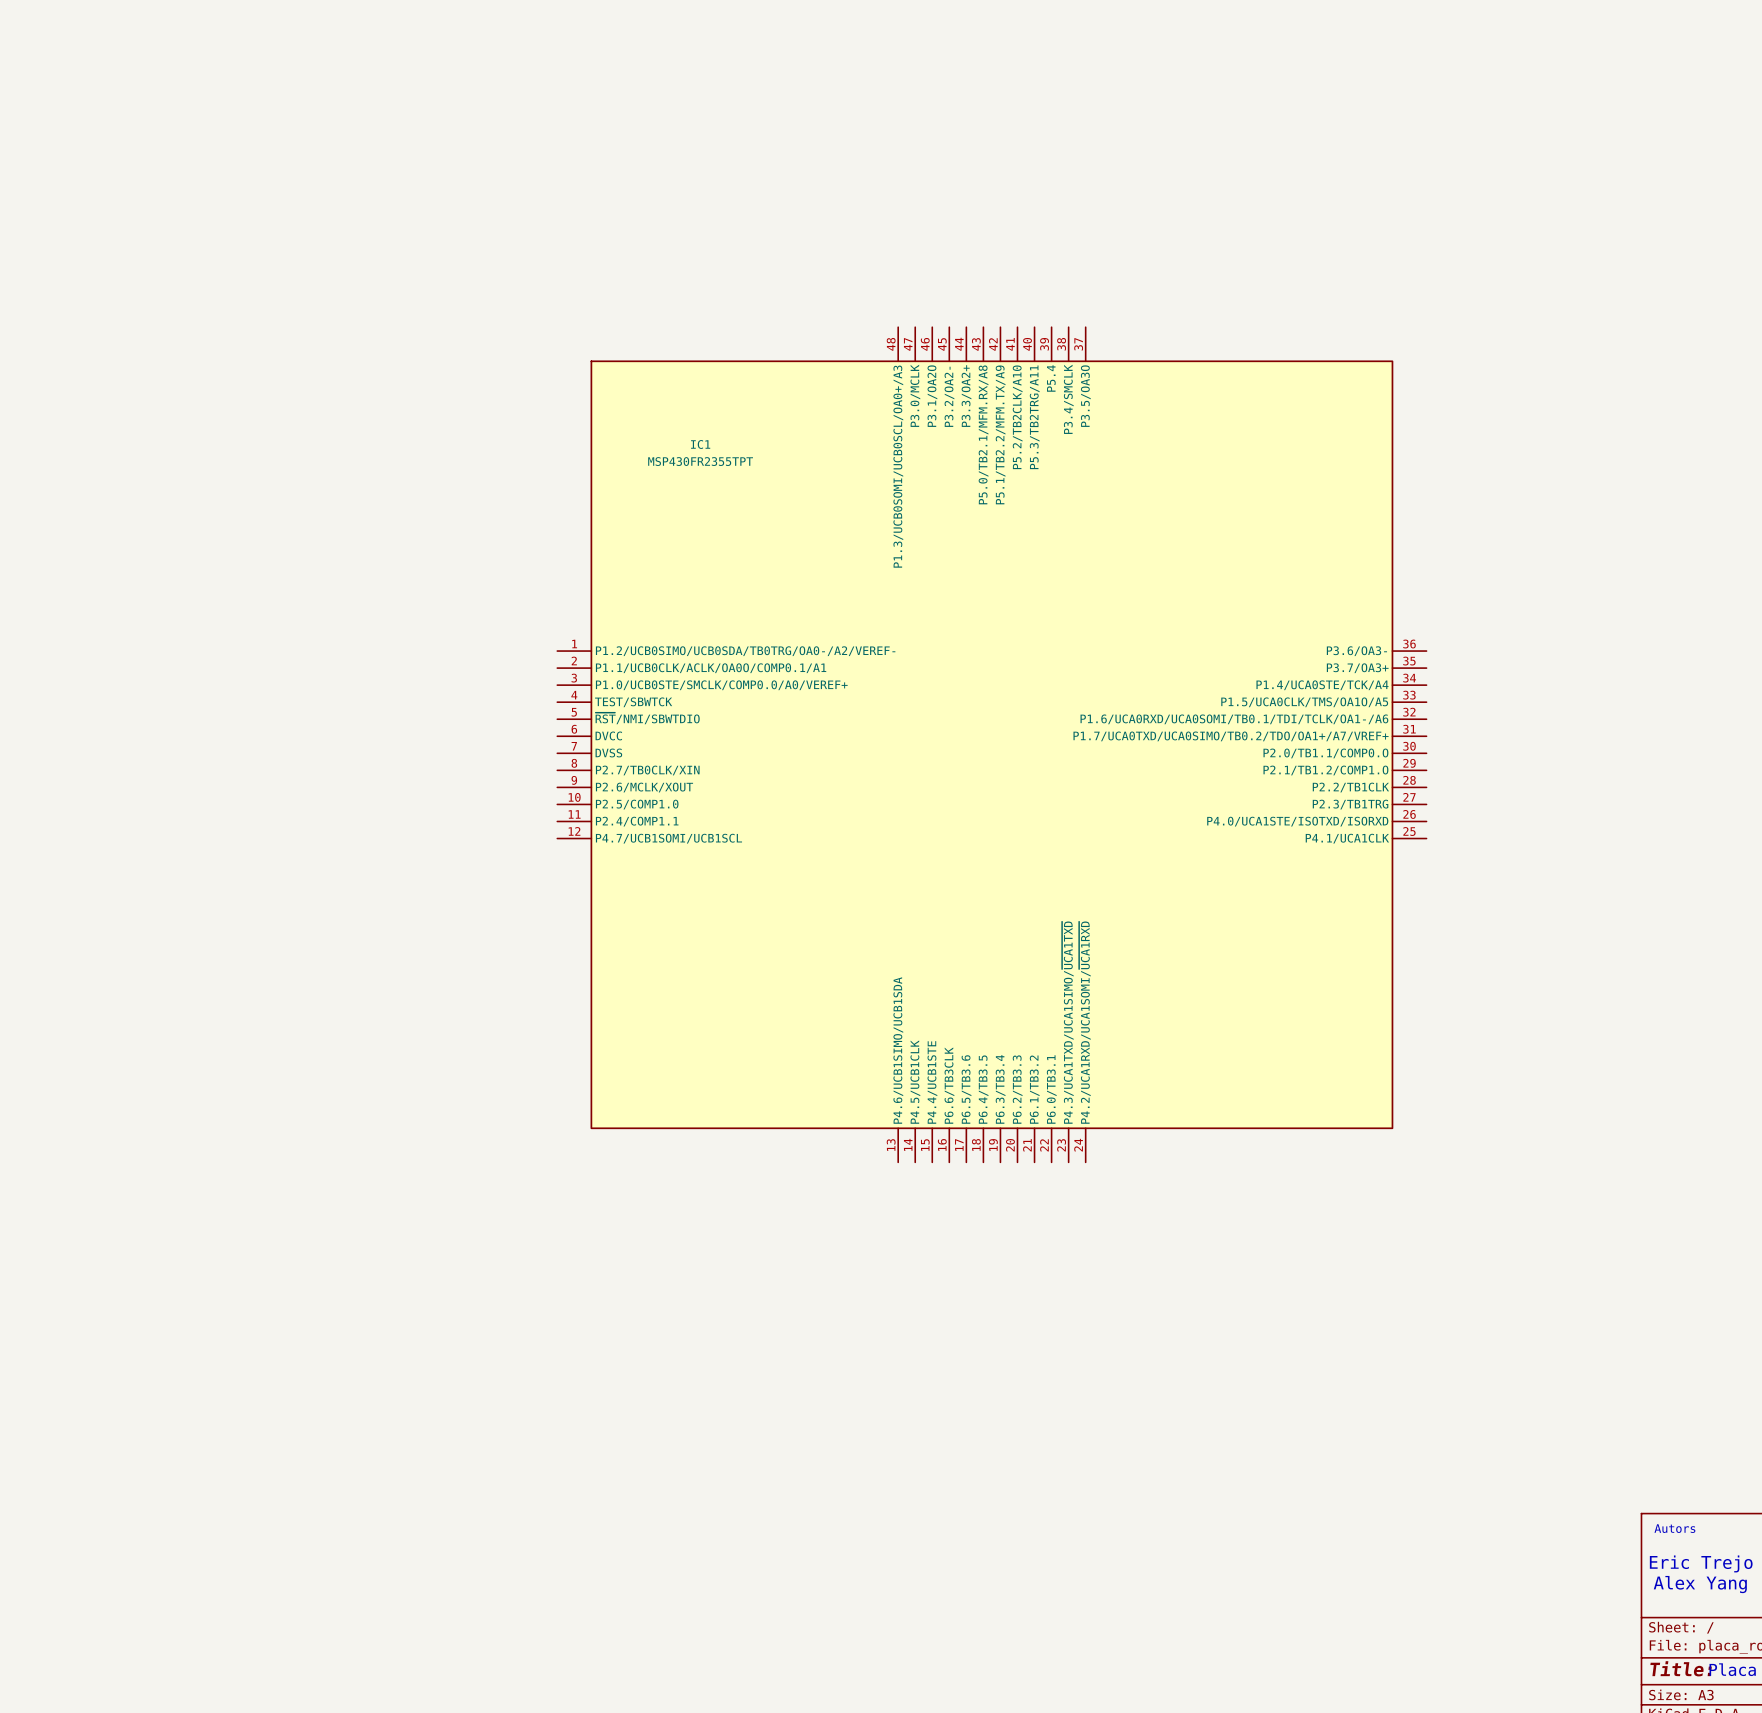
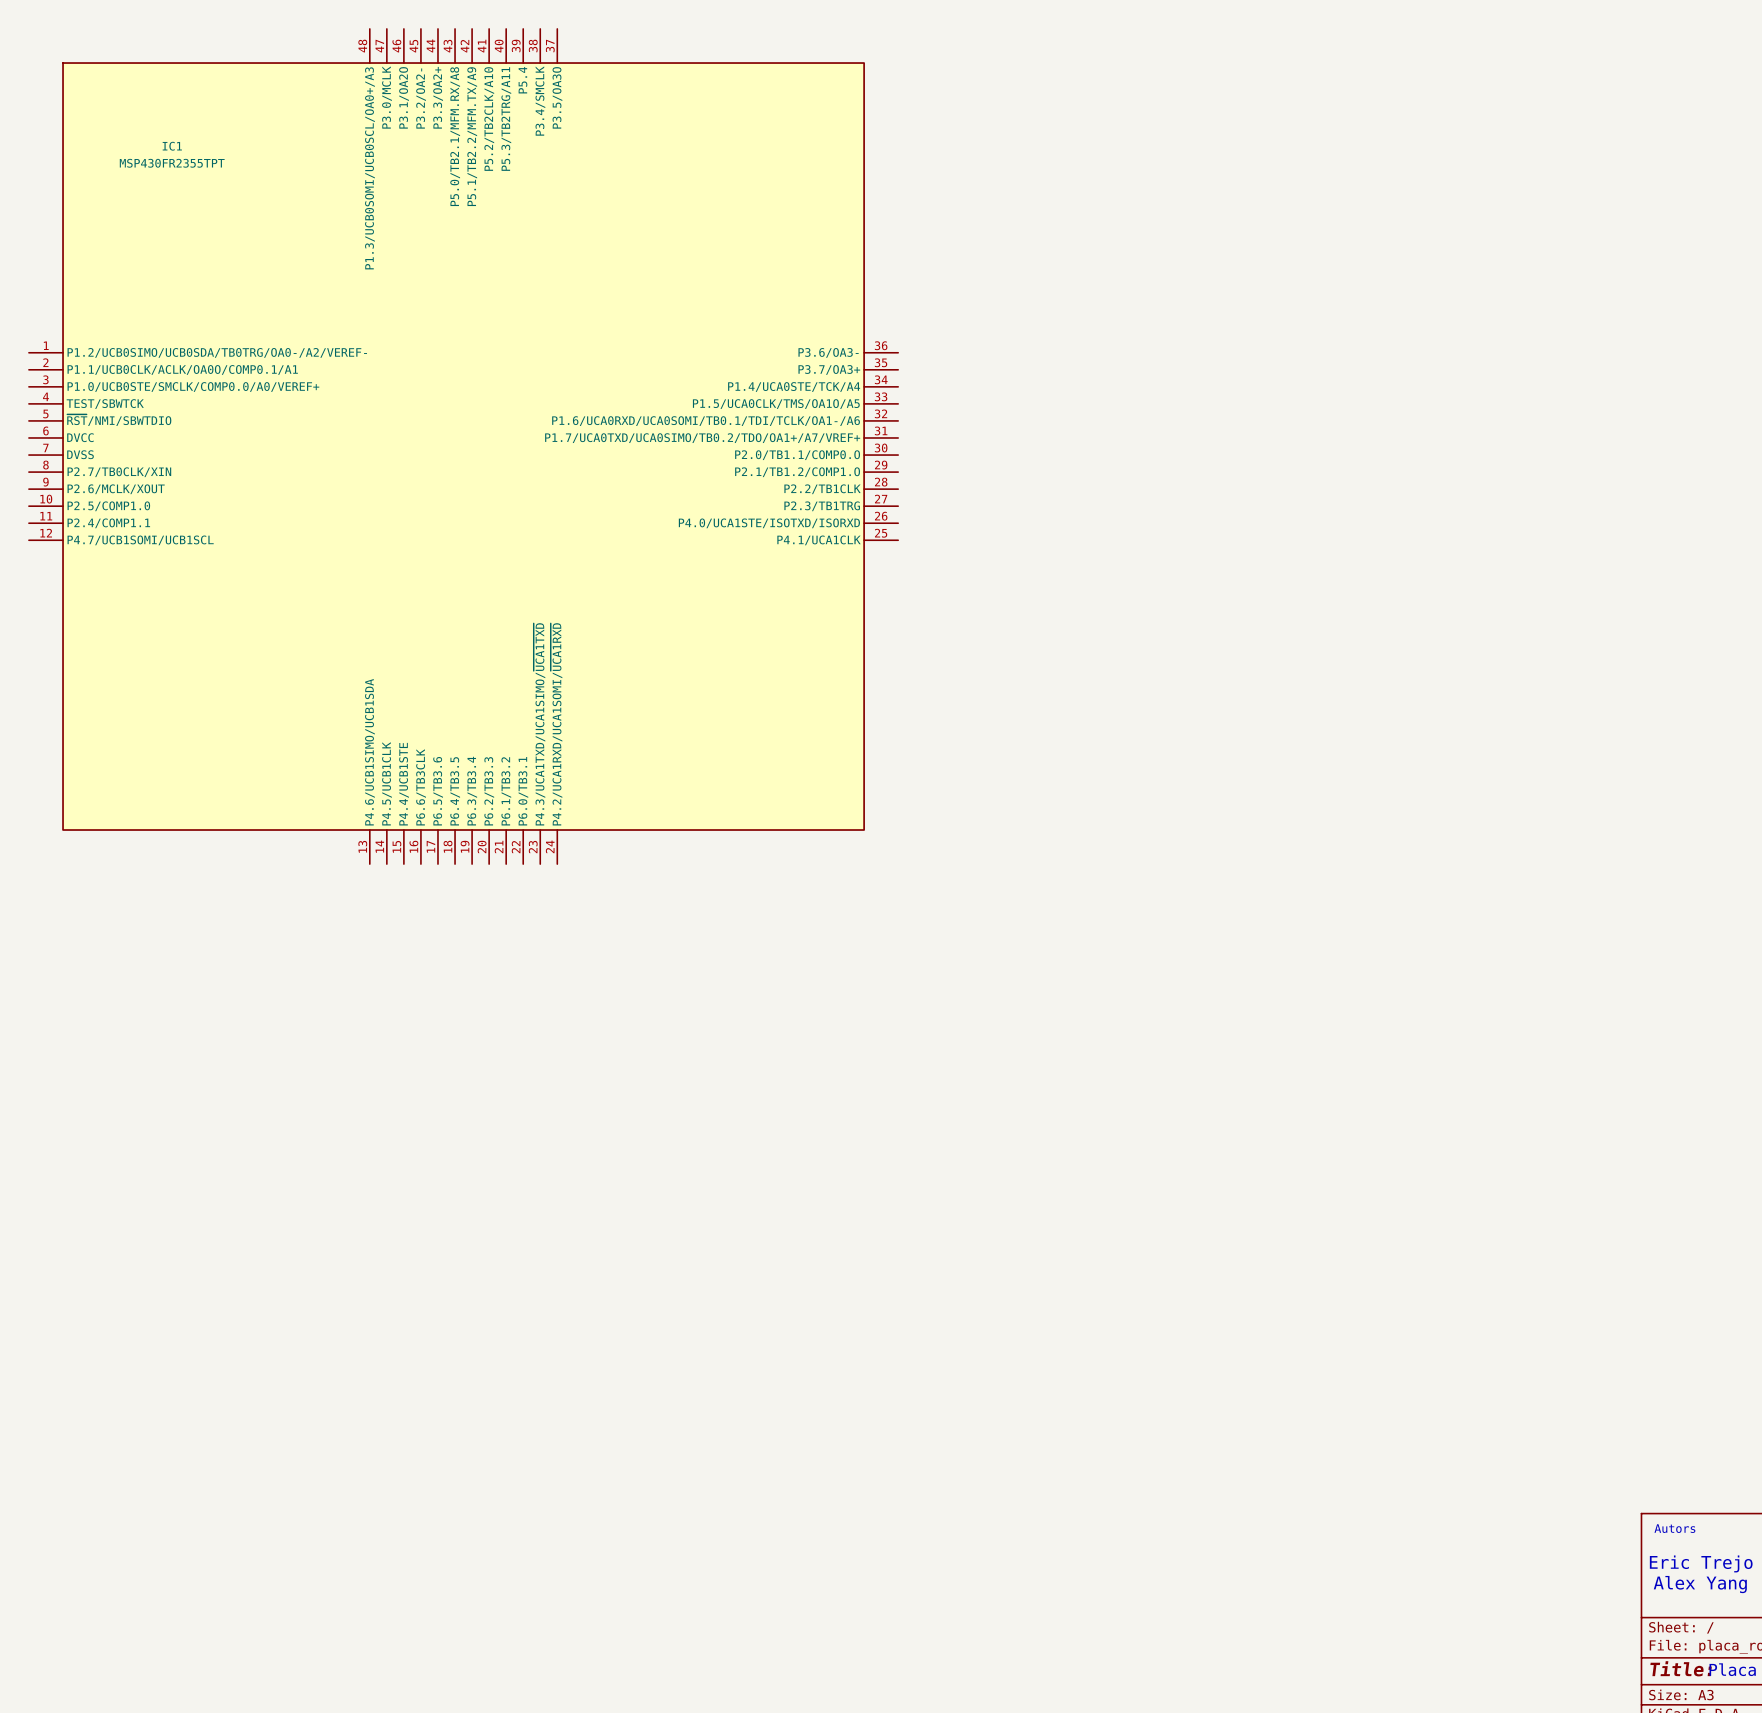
IC1 position: (991, 744) -> (463, 446)

